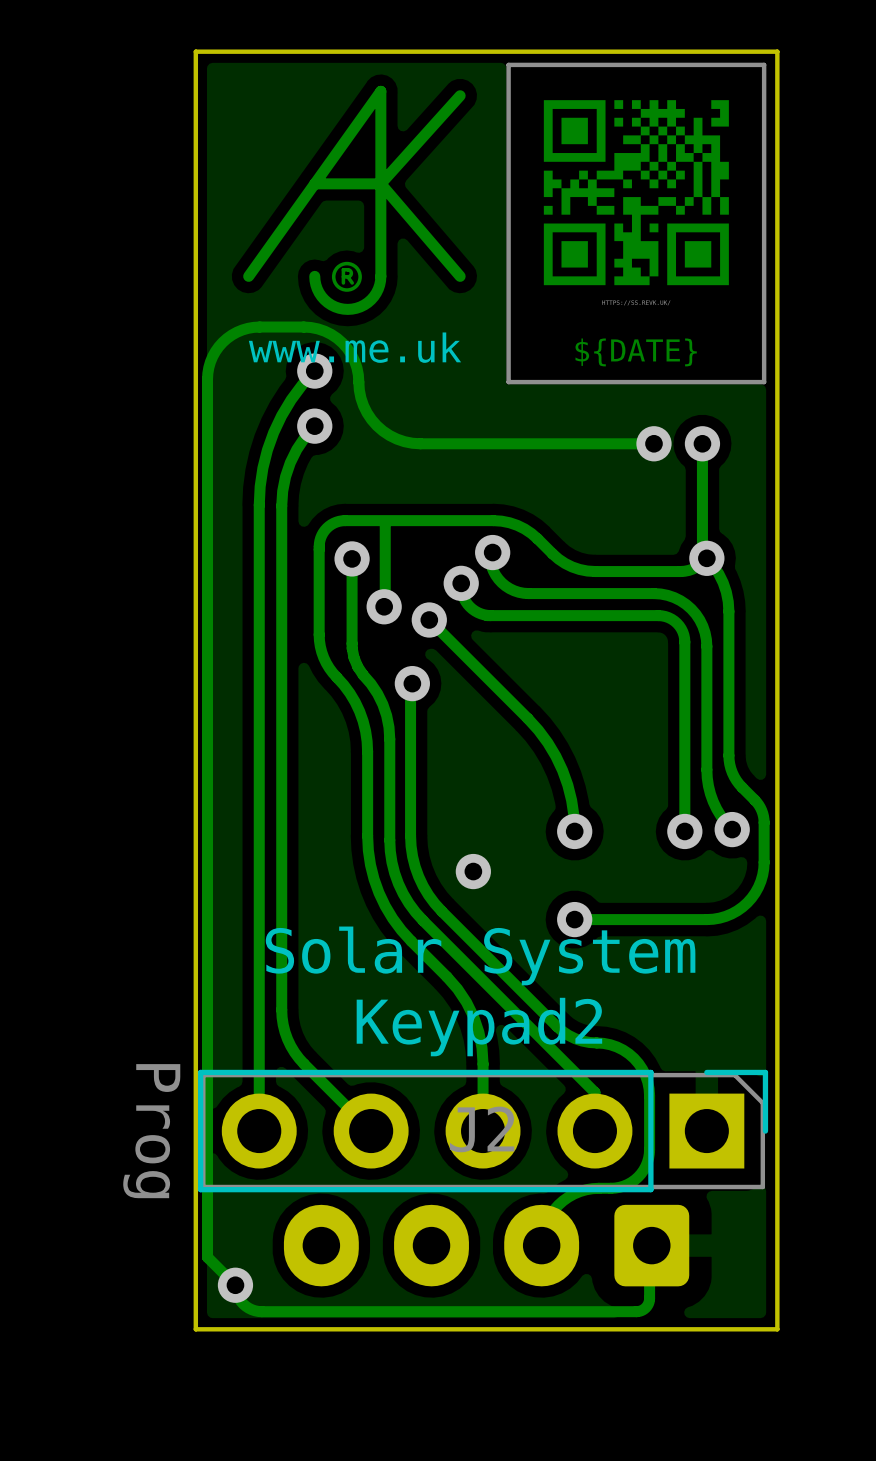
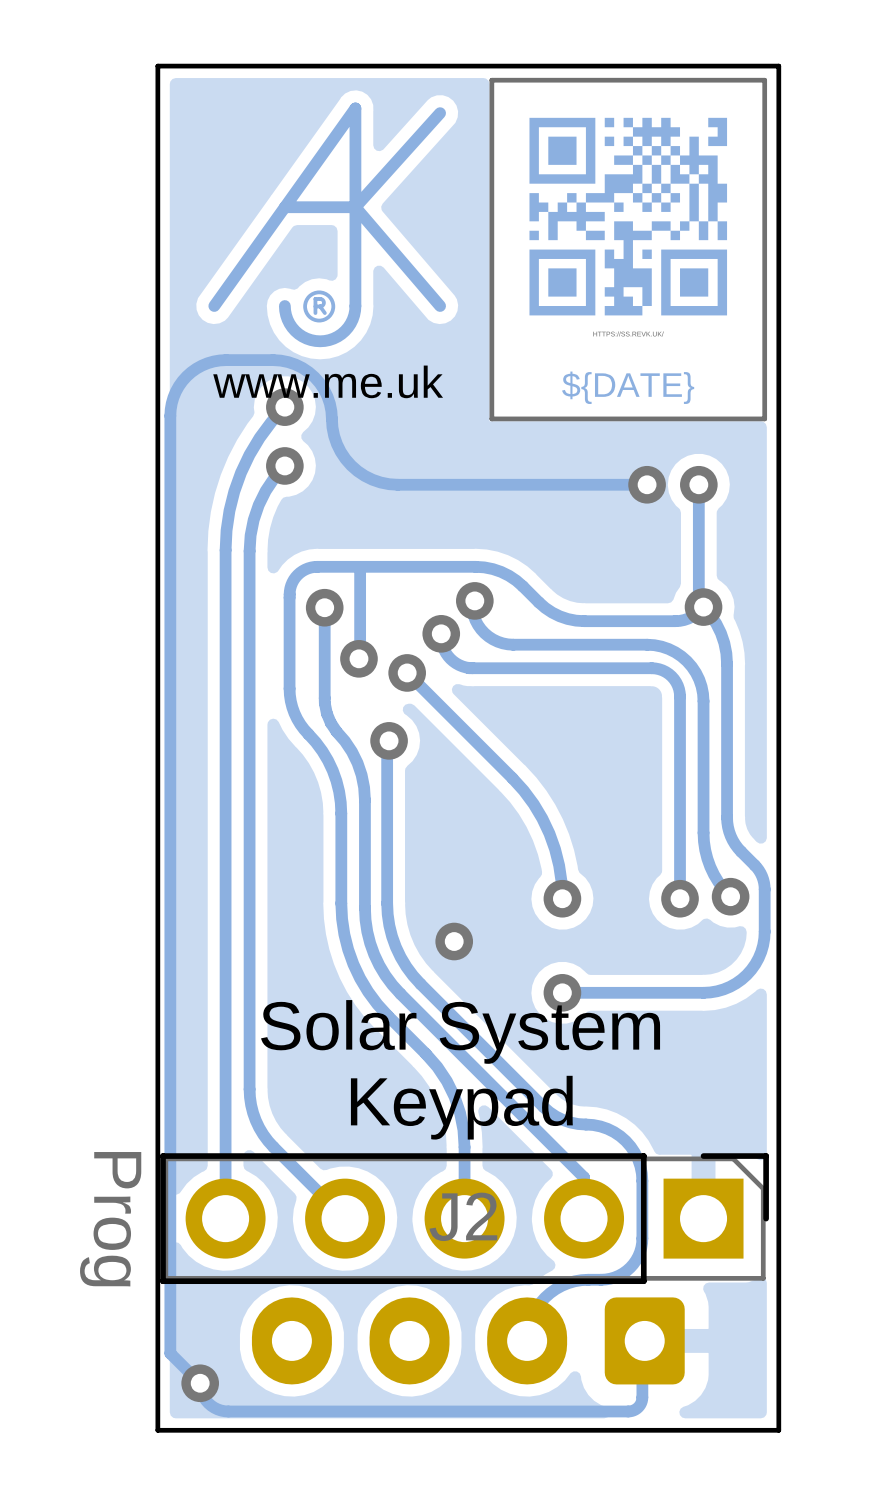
text: Keypad2 (479, 1027) -> Keypad (461, 1107)

